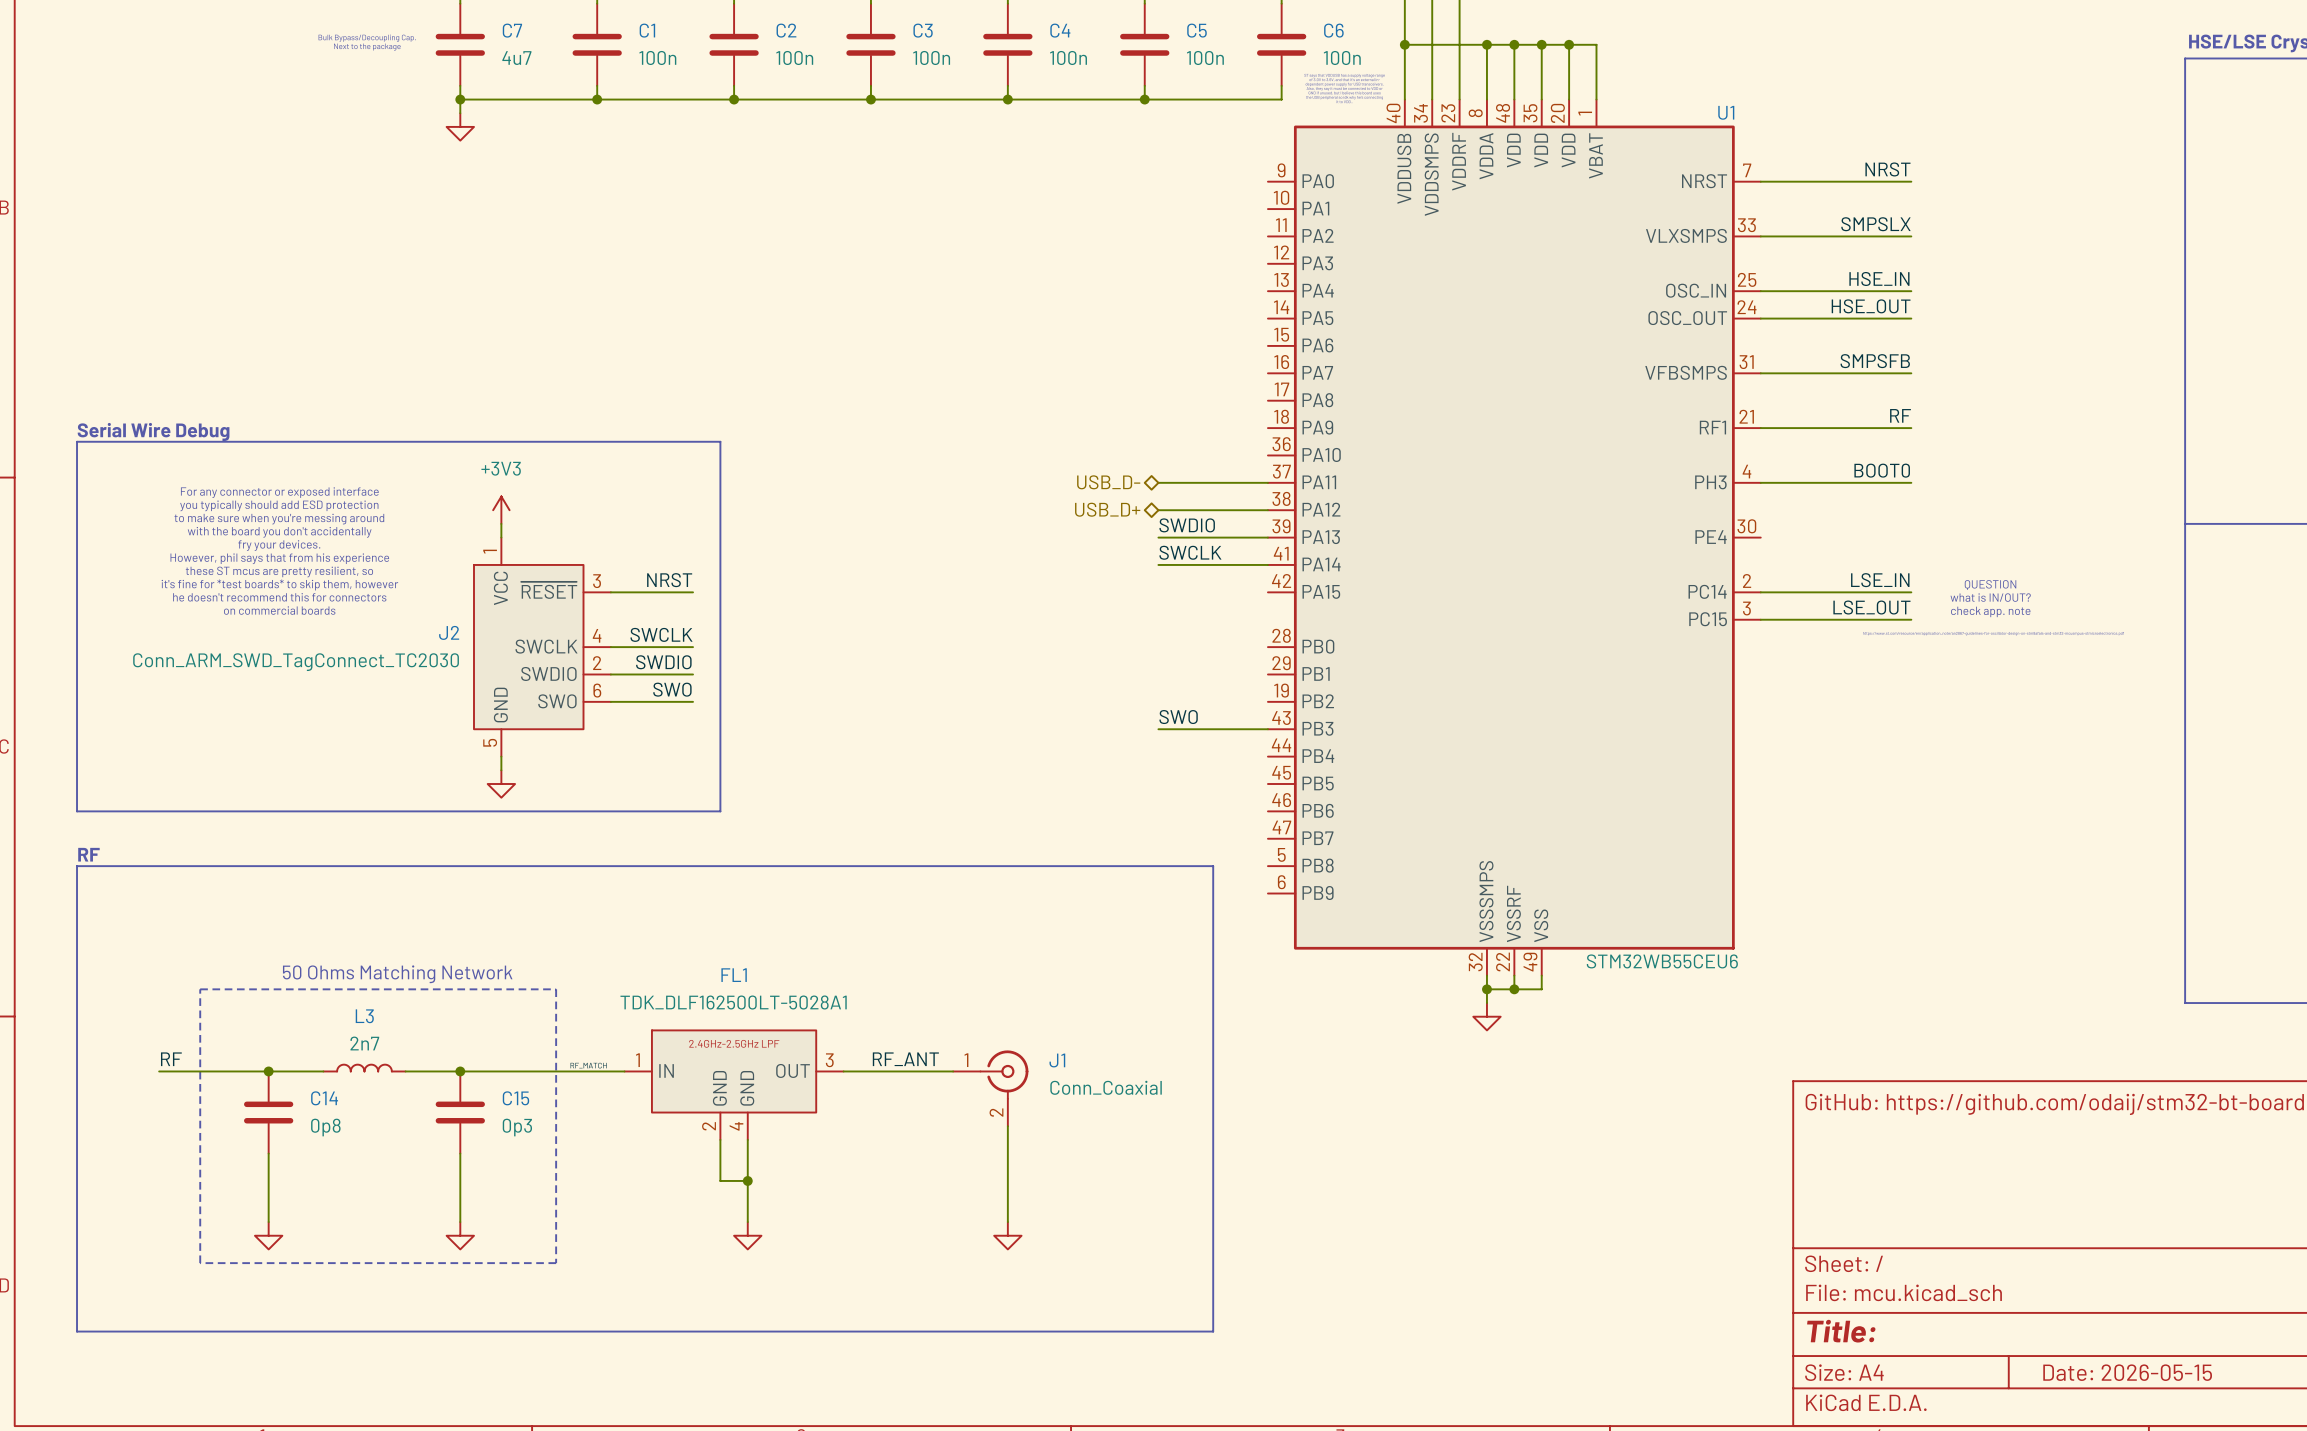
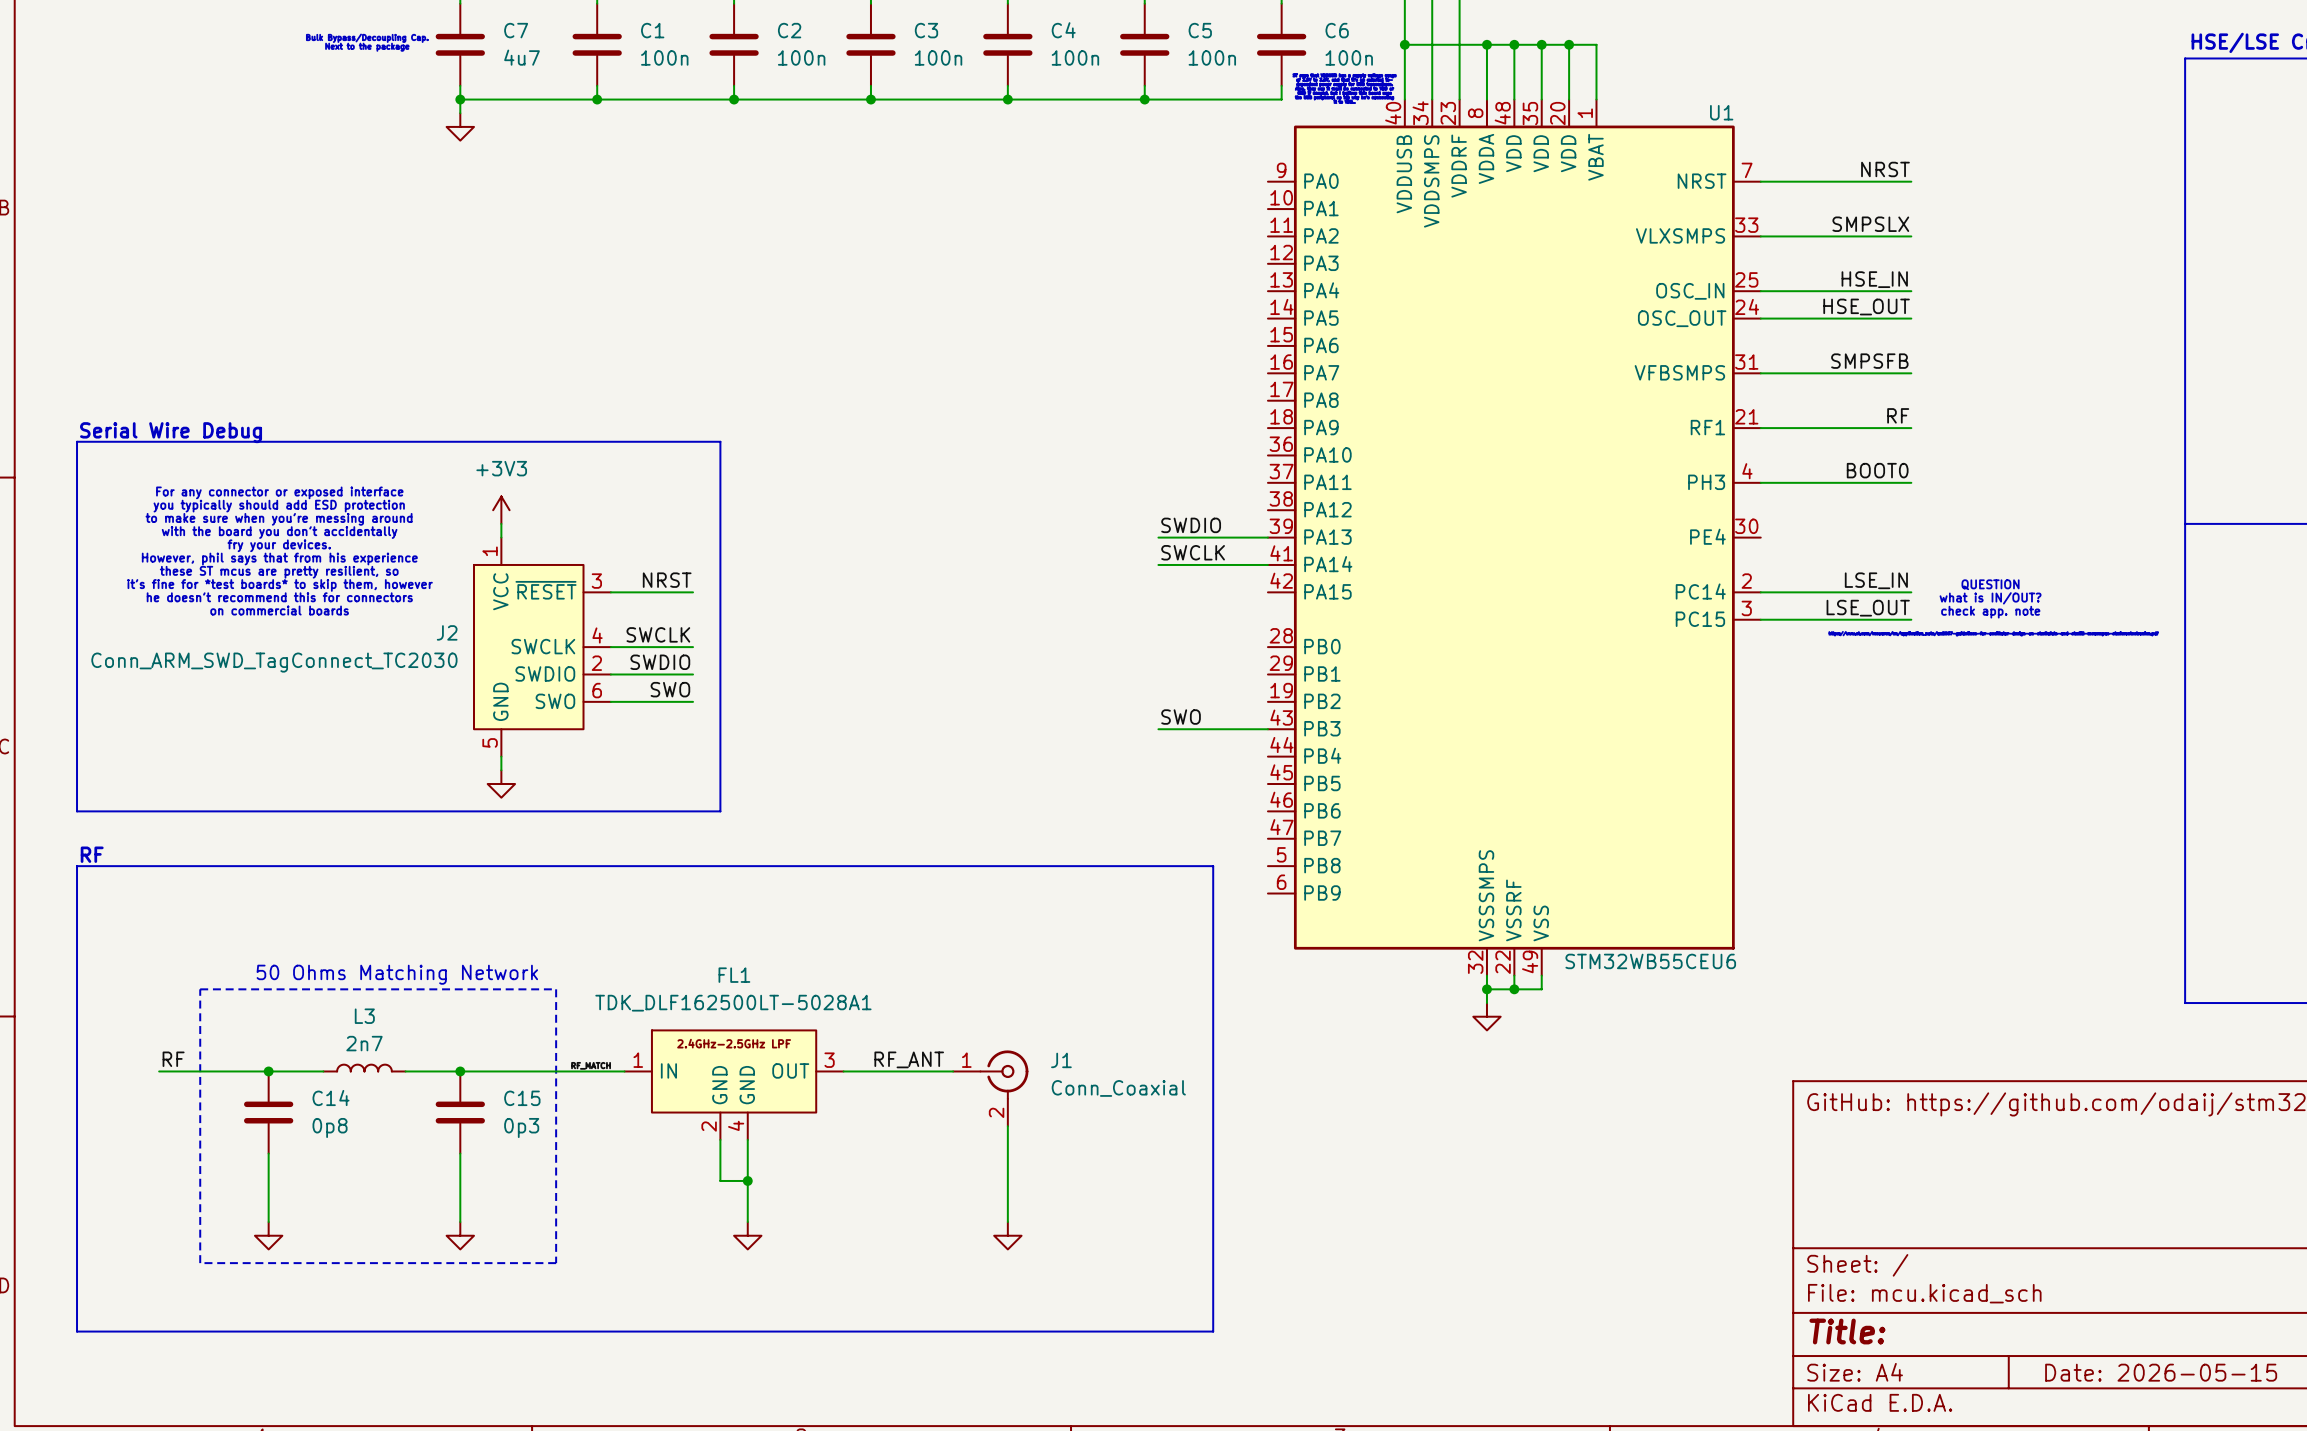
hierarchical label: USB_D- (1108, 482) -> none
wire: (1158, 482) (1267, 482) -> none
hierarchical label: USB_D+ (1107, 509) -> none
wire: (1158, 510) (1267, 510) -> none

